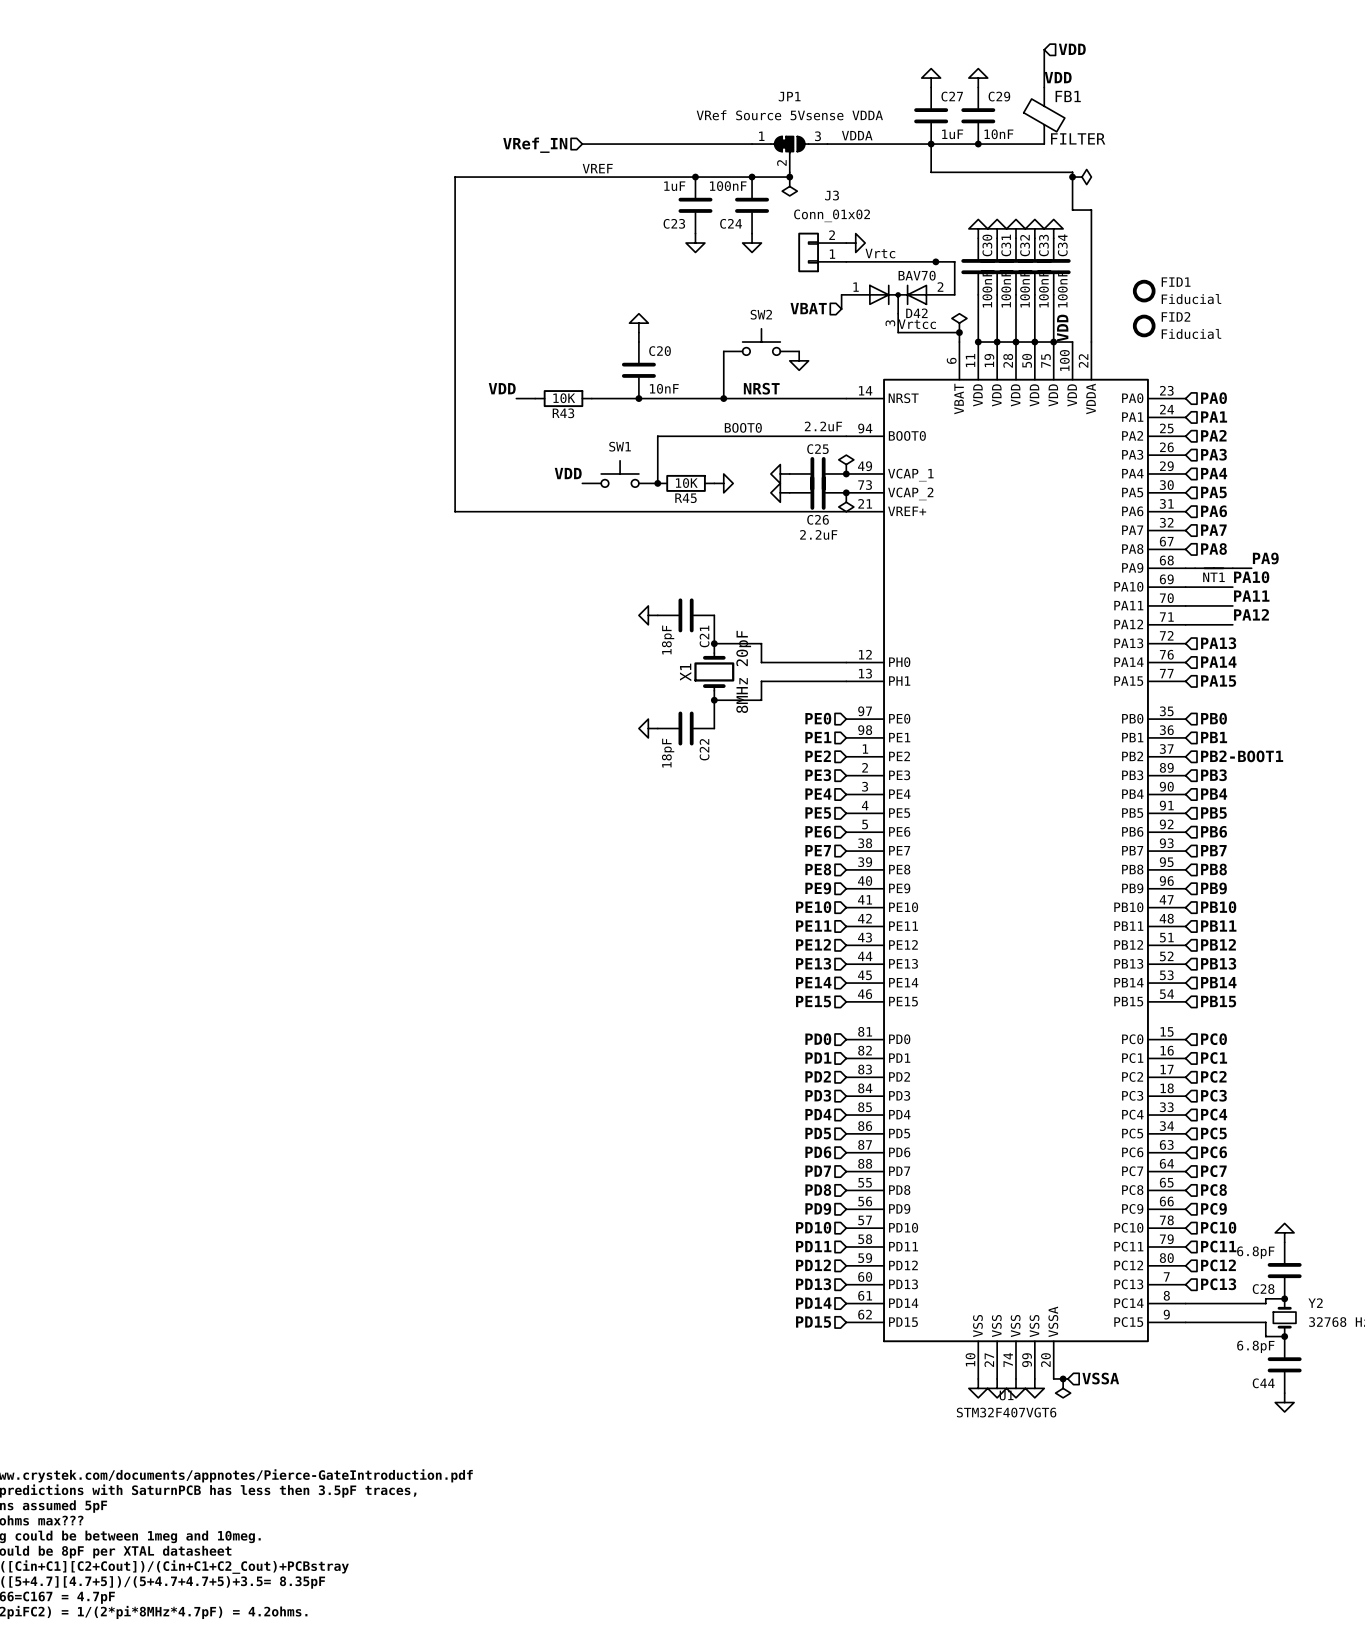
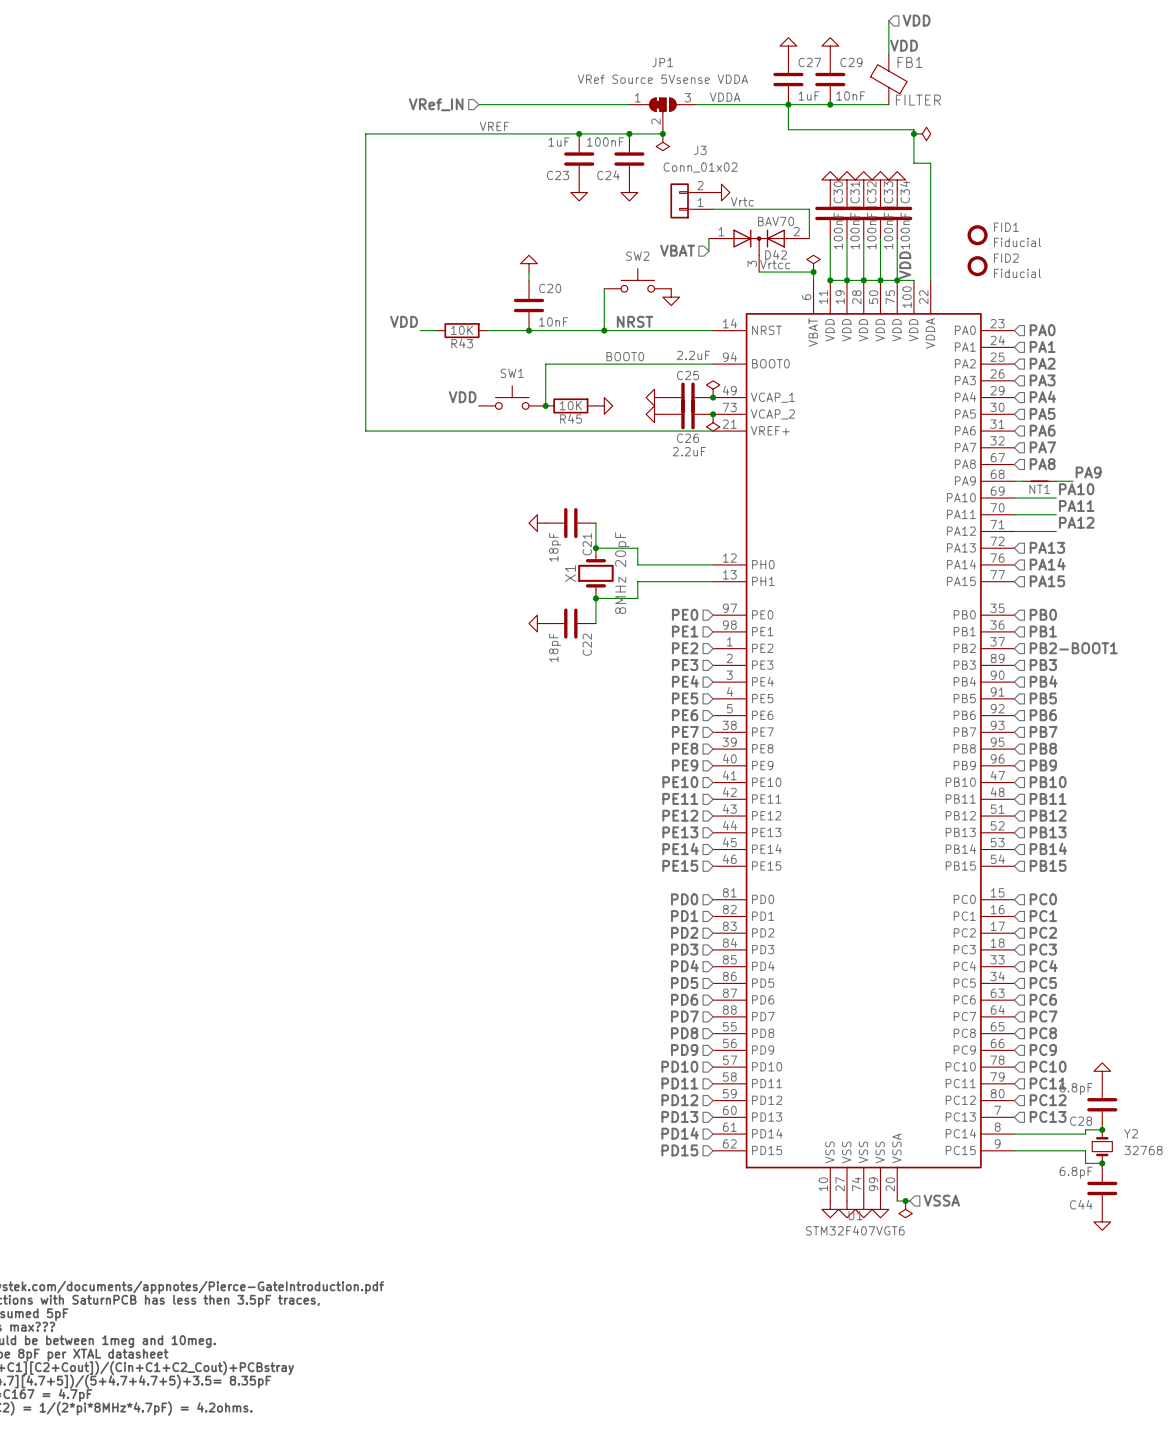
junction: (935, 261) -> none

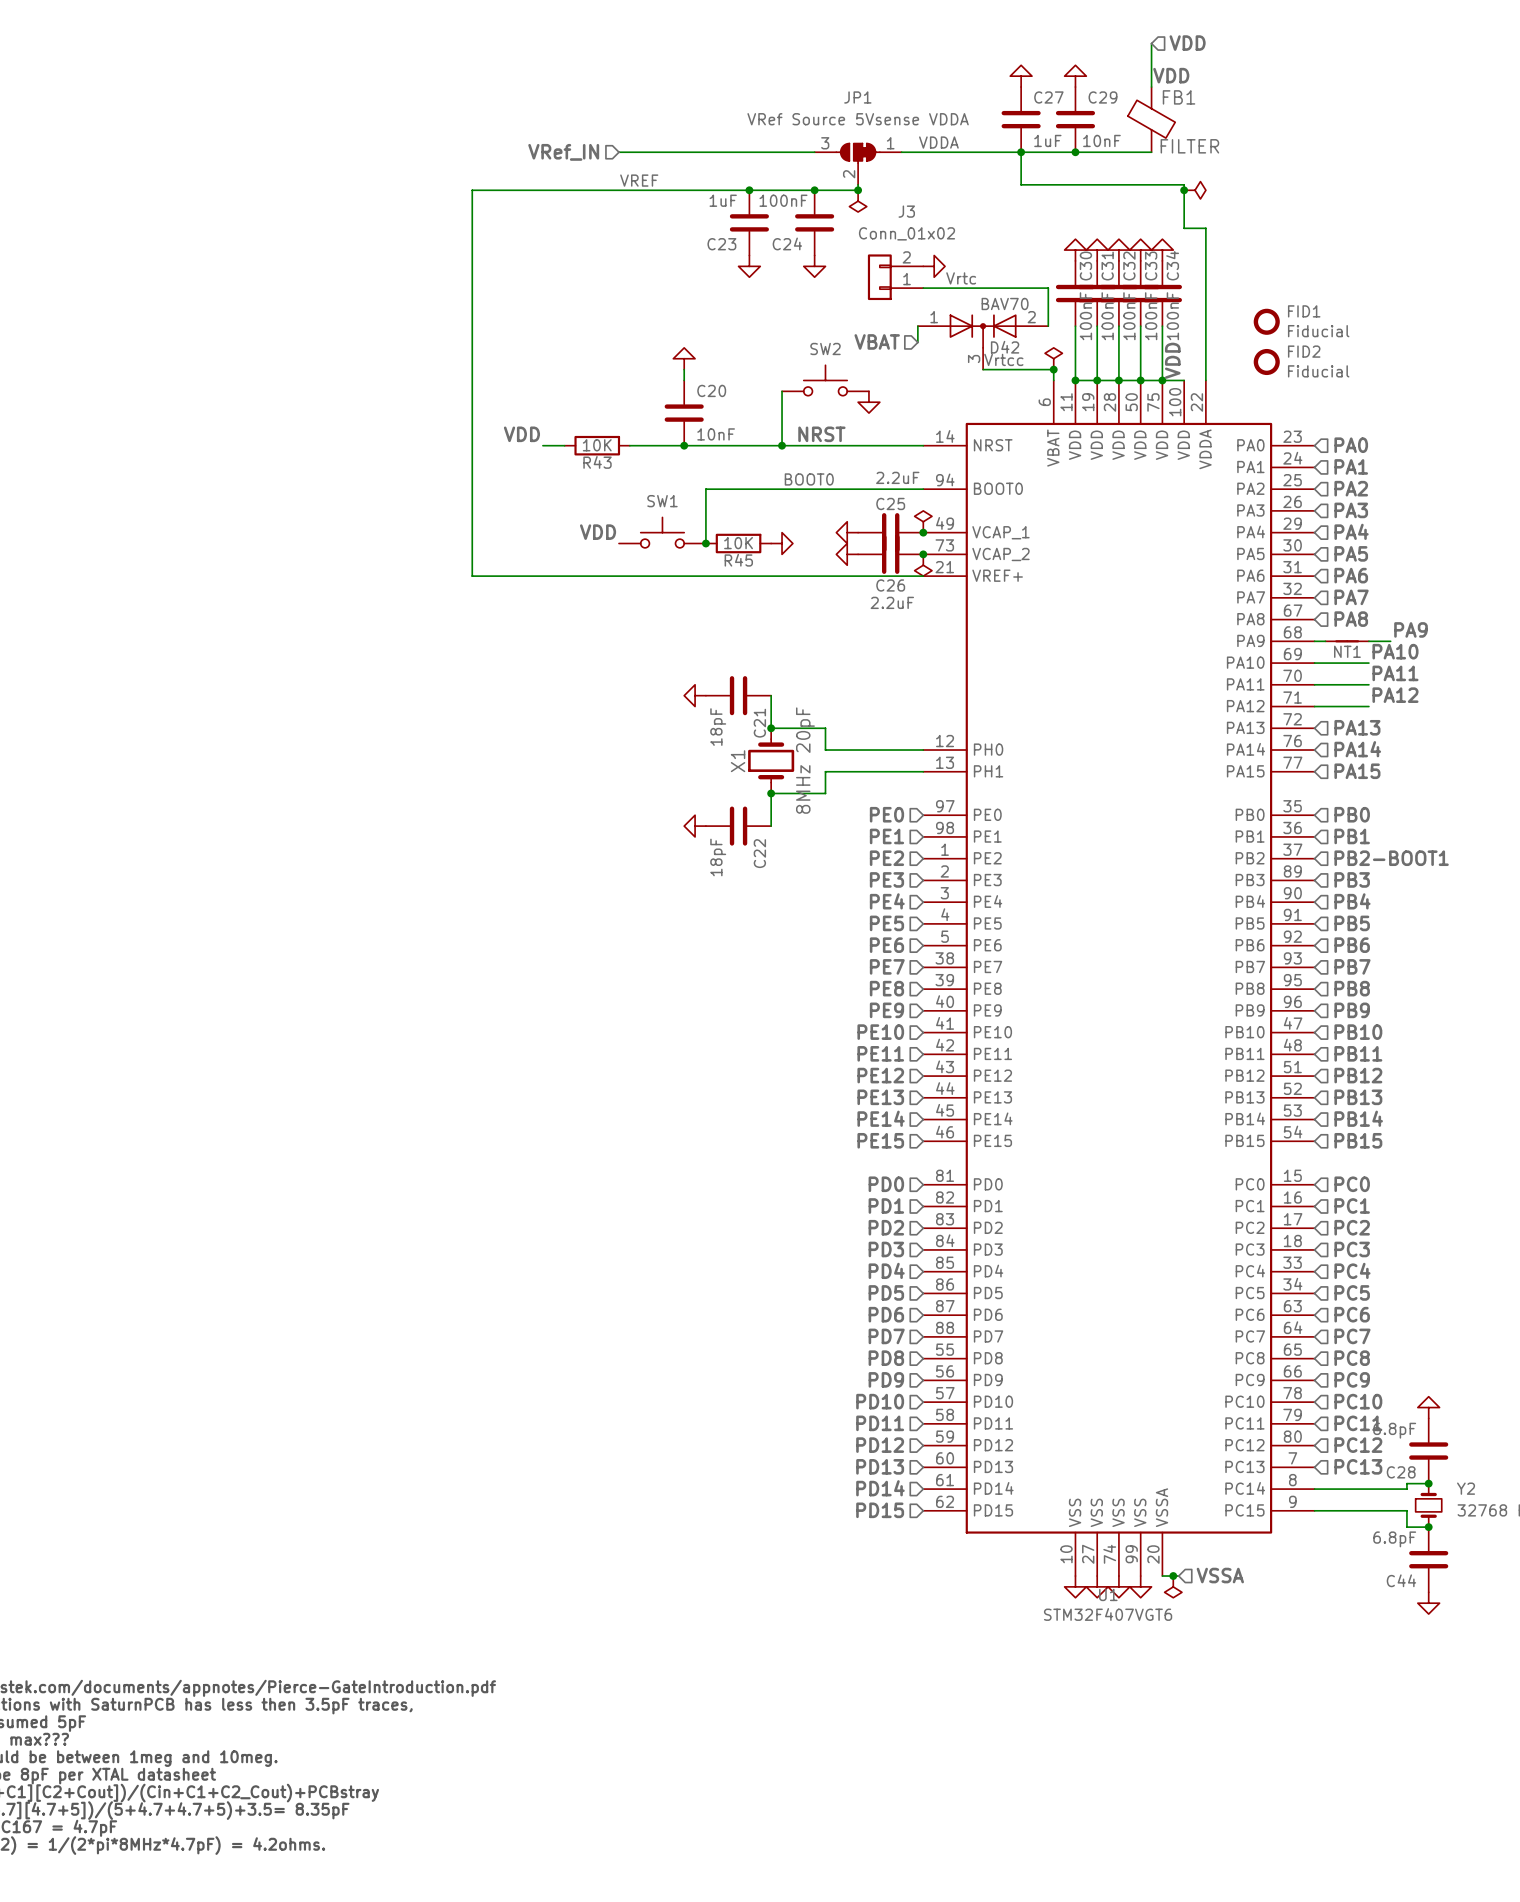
JP1 flip: as is (662, 105) -> left-right (858, 153)

